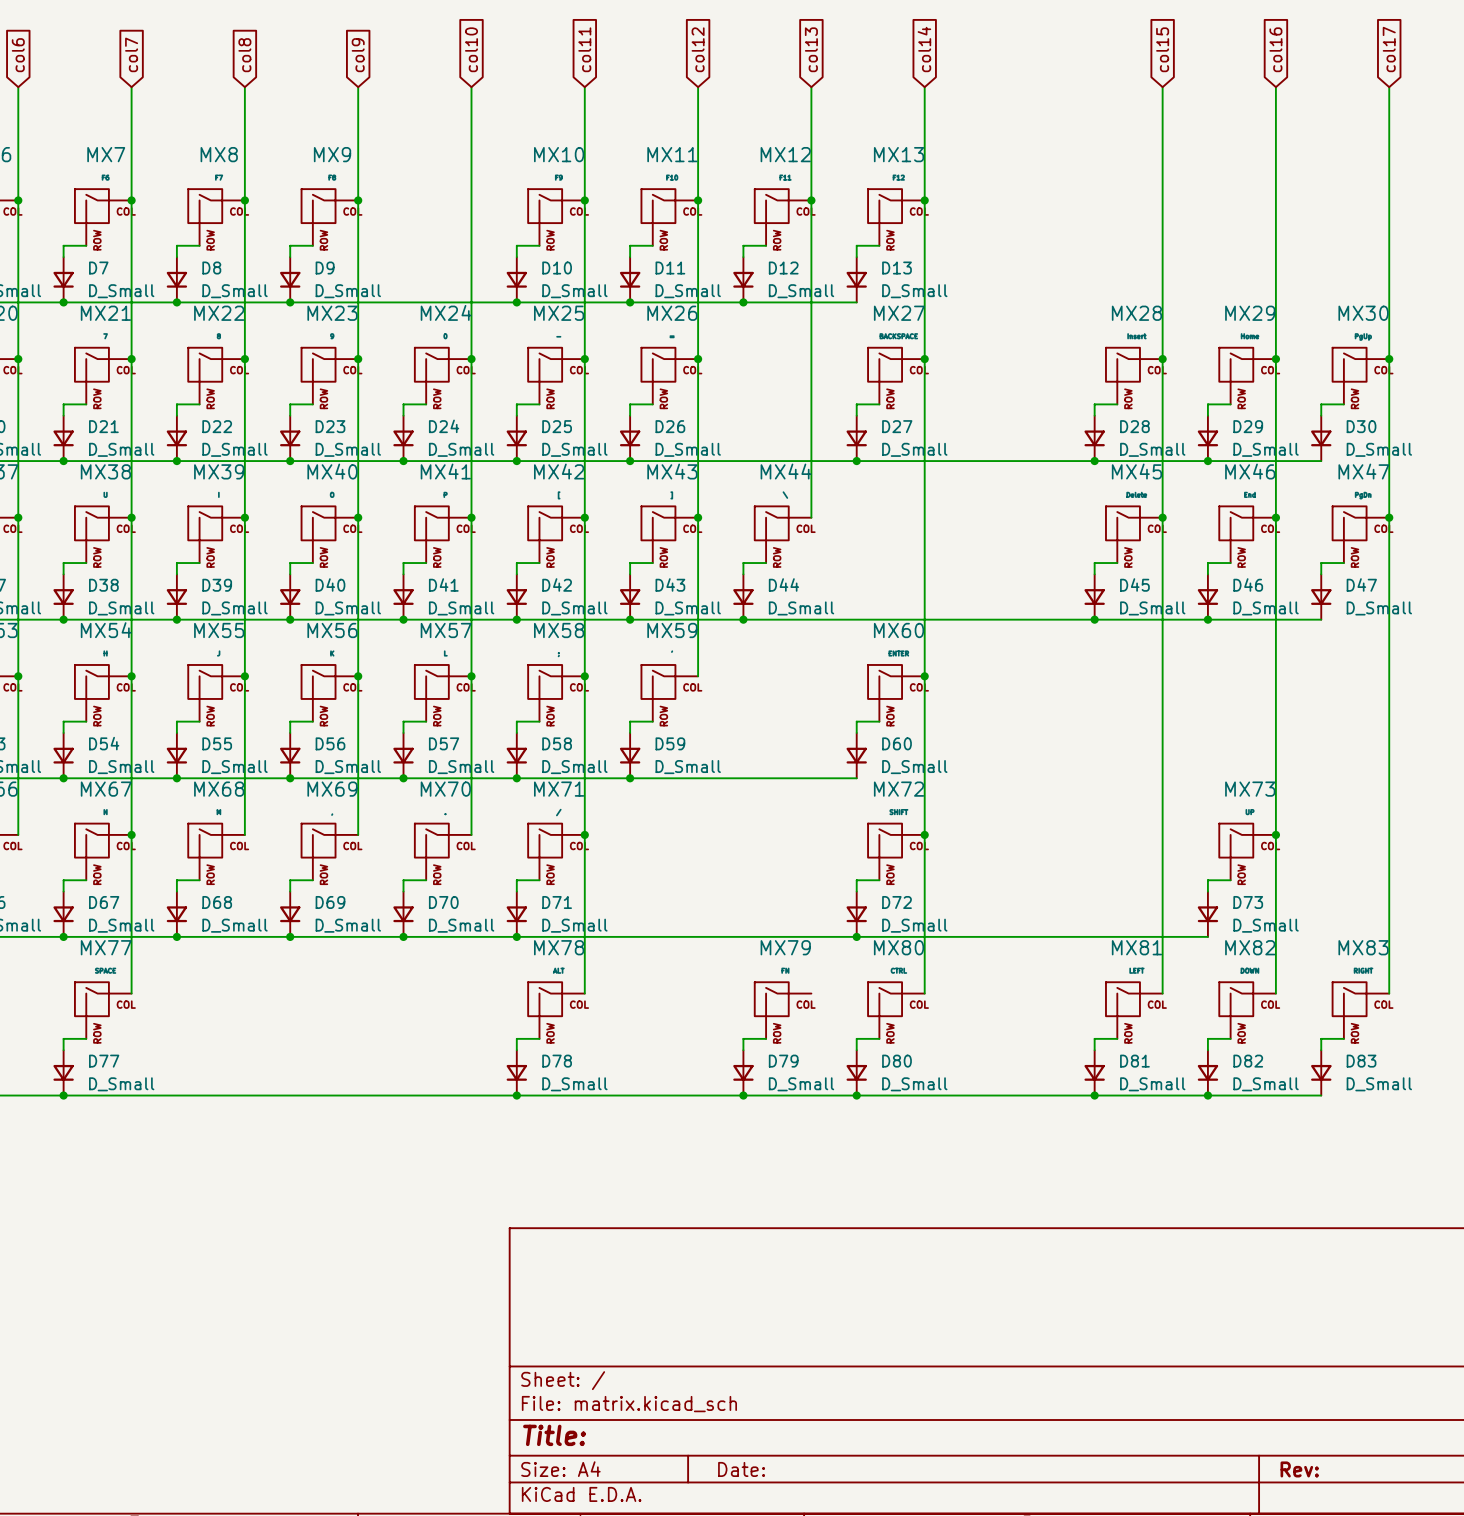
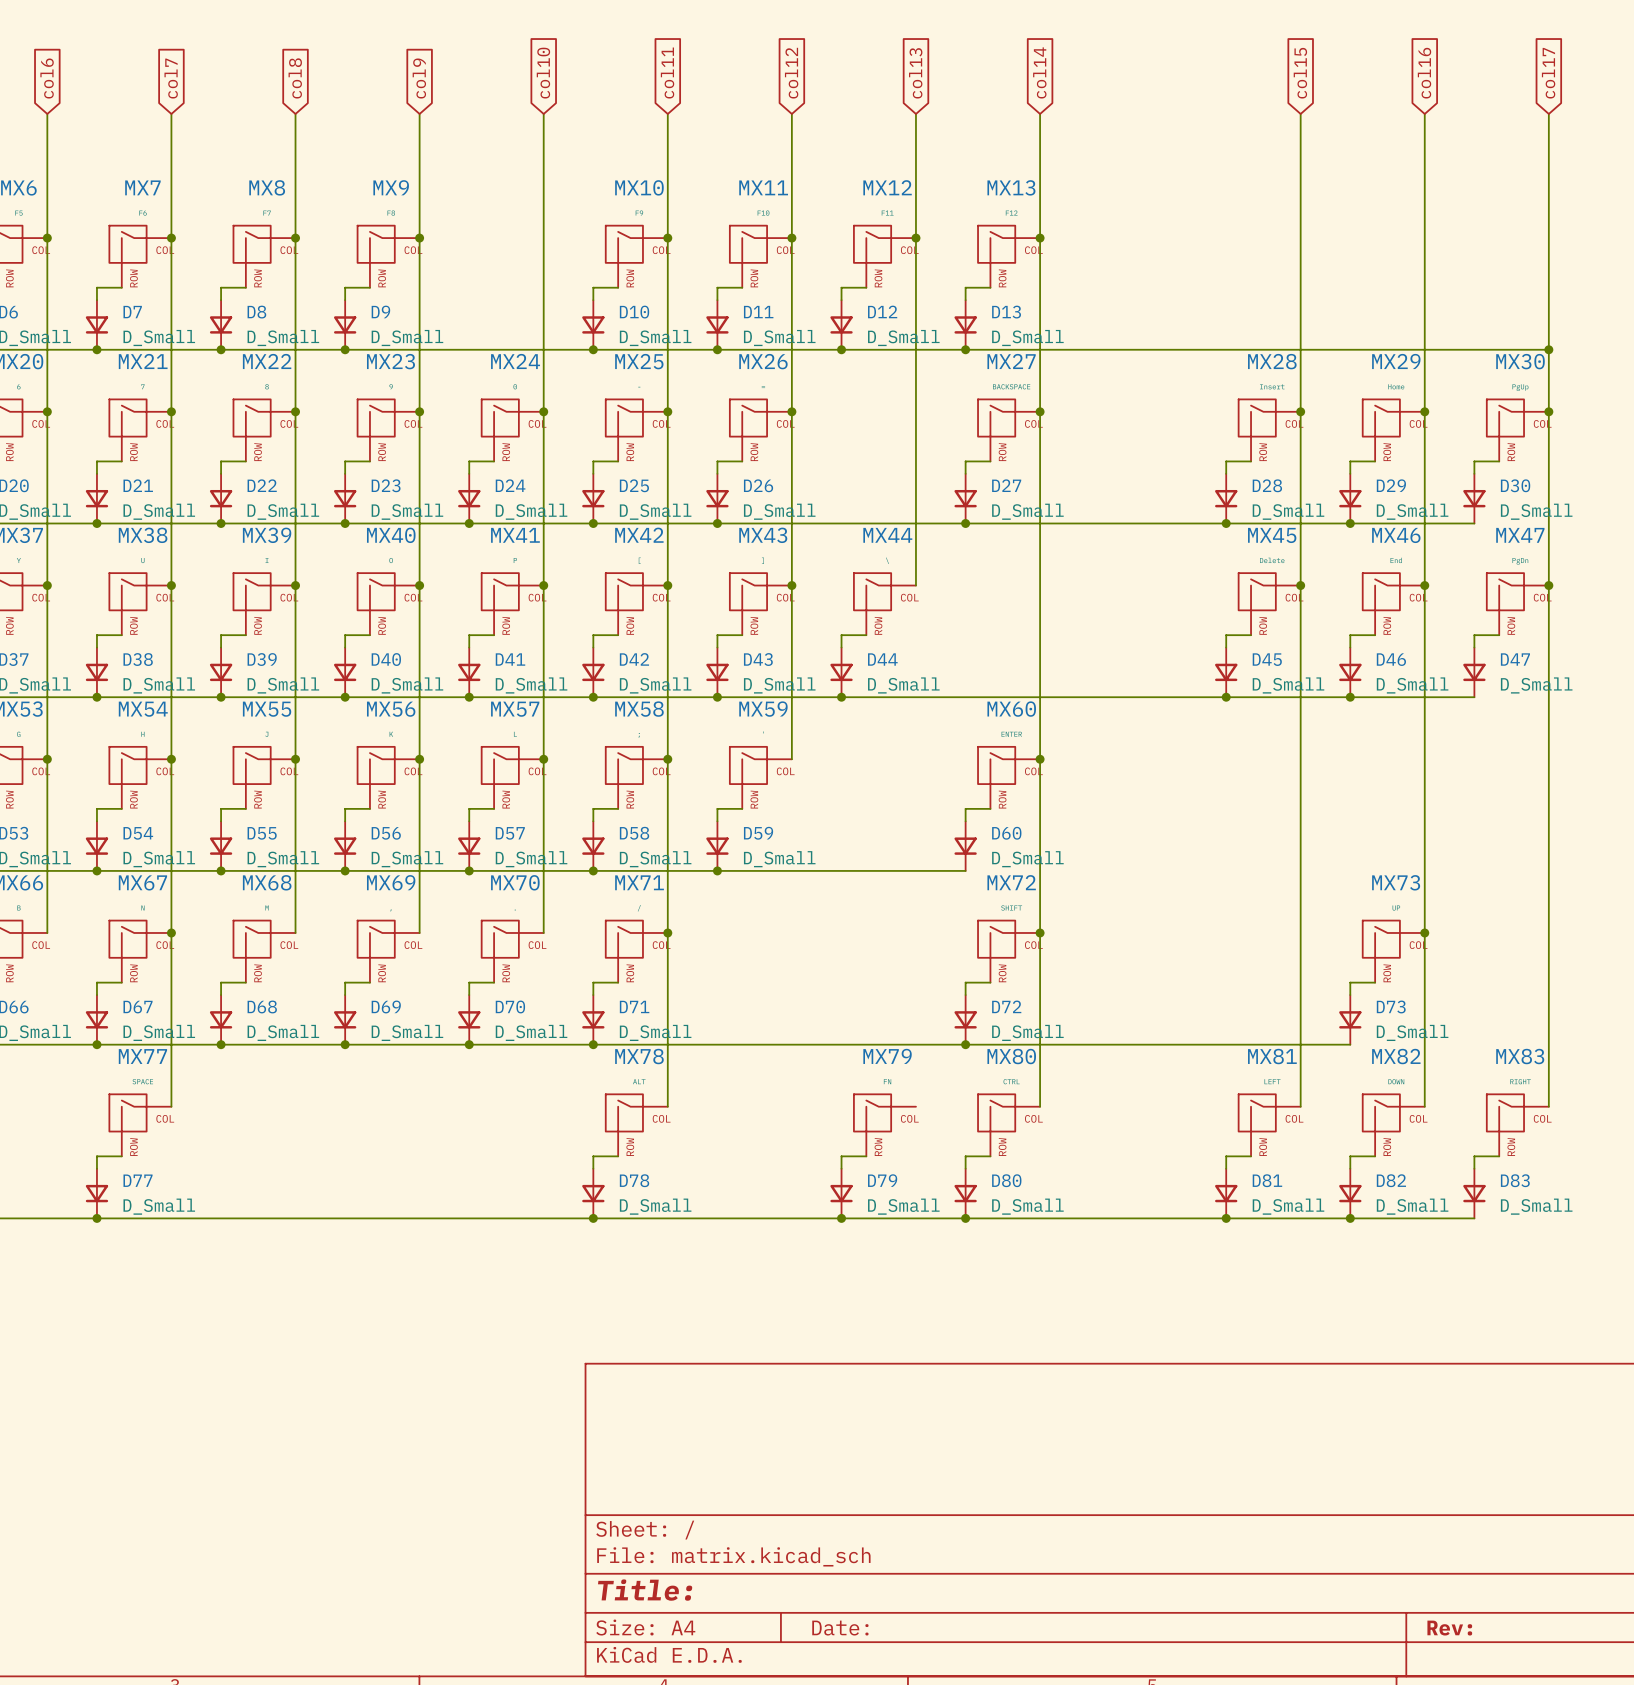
wire: none -> (965, 349) (1548, 349)
junction: none -> (965, 349)
junction: none -> (1548, 349)

